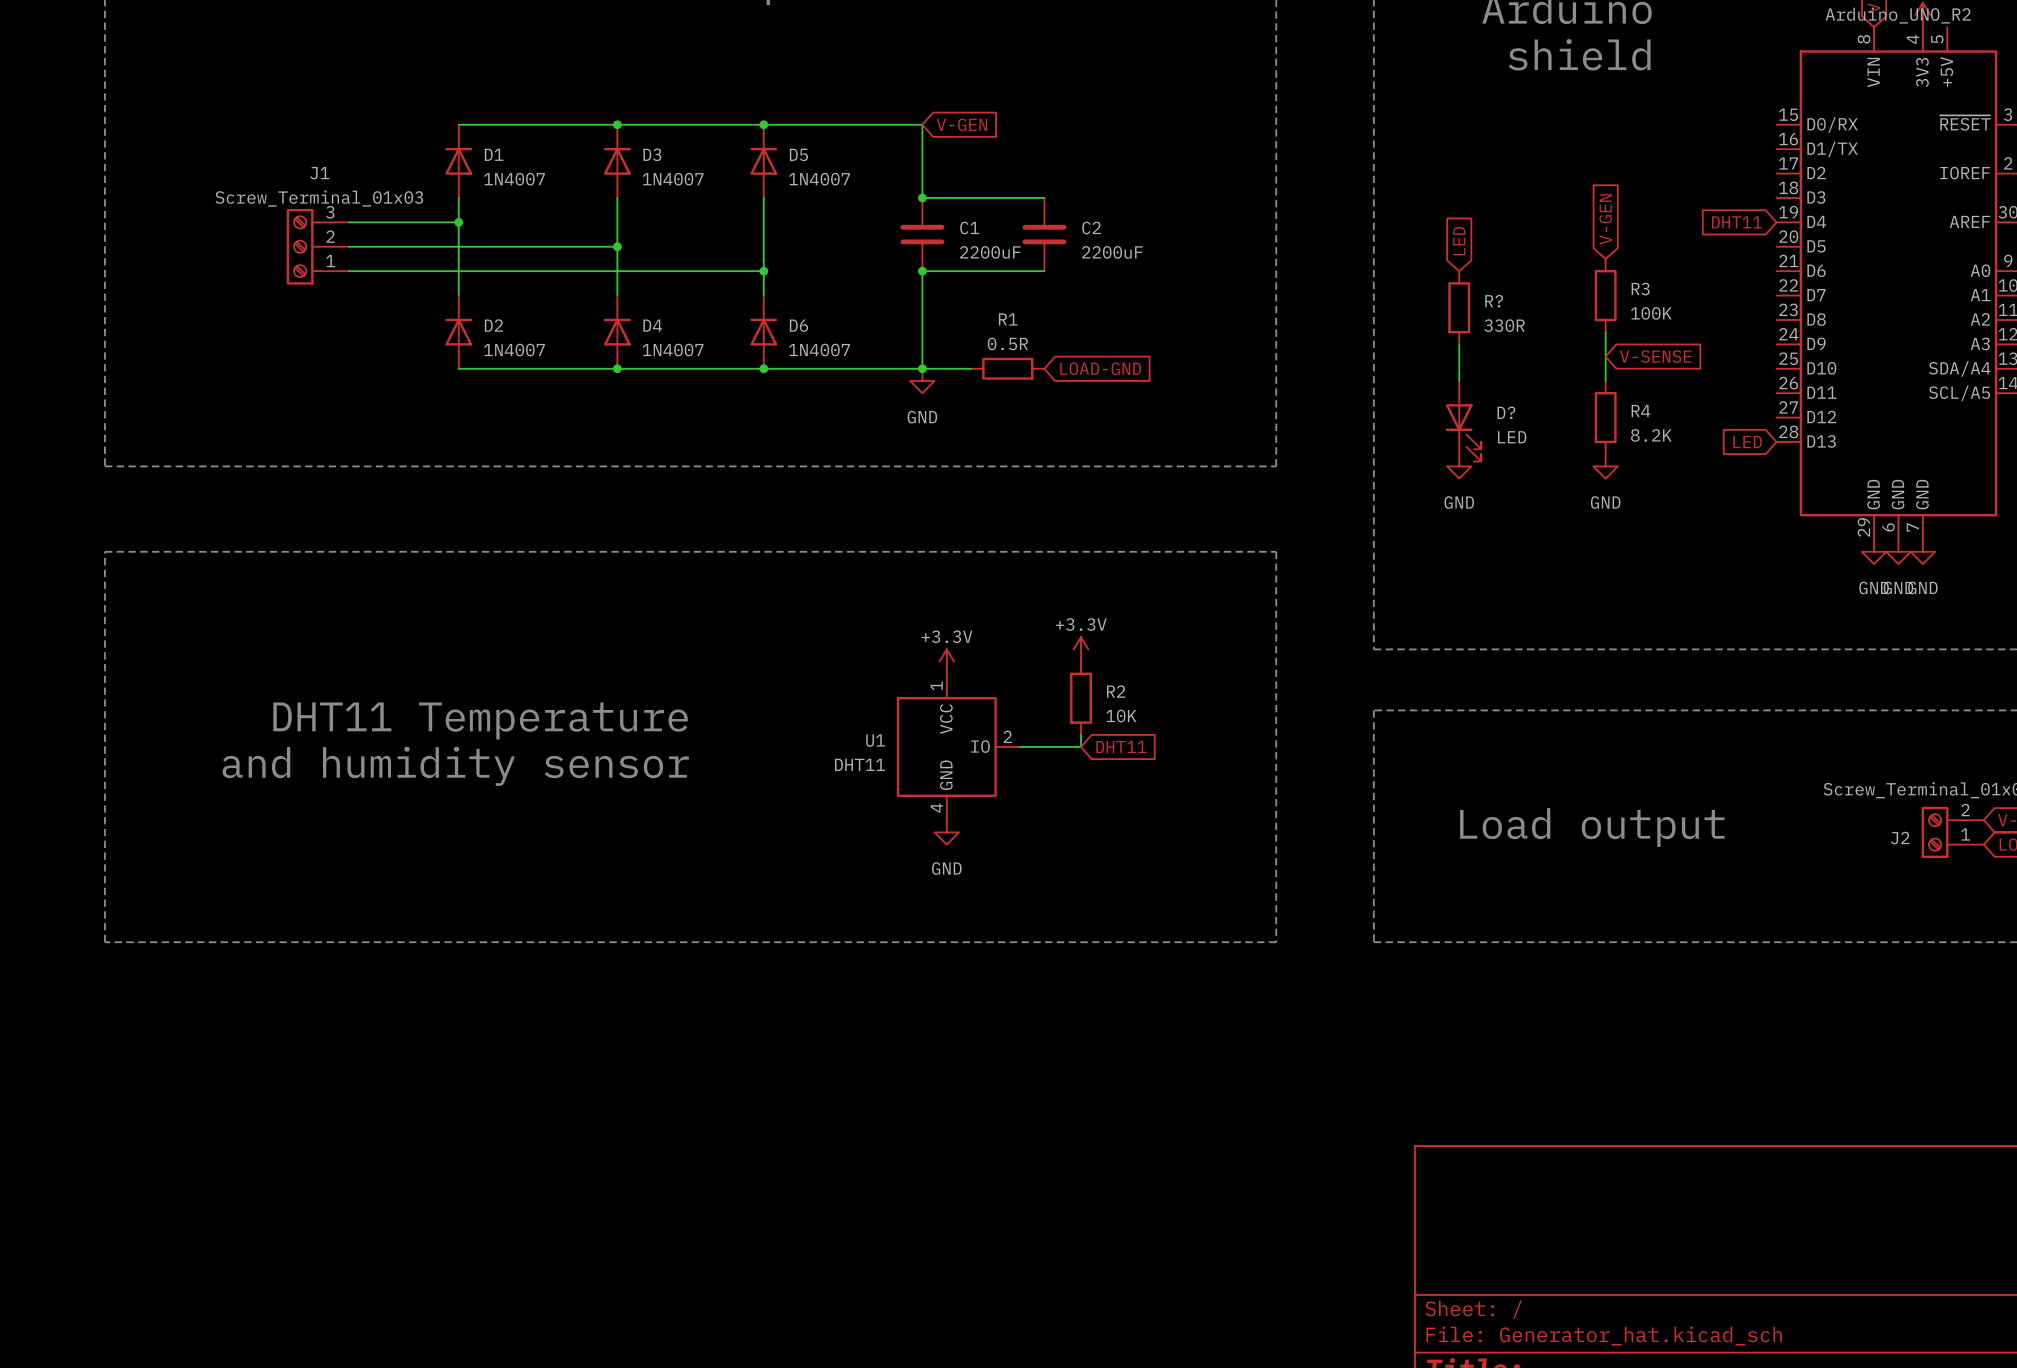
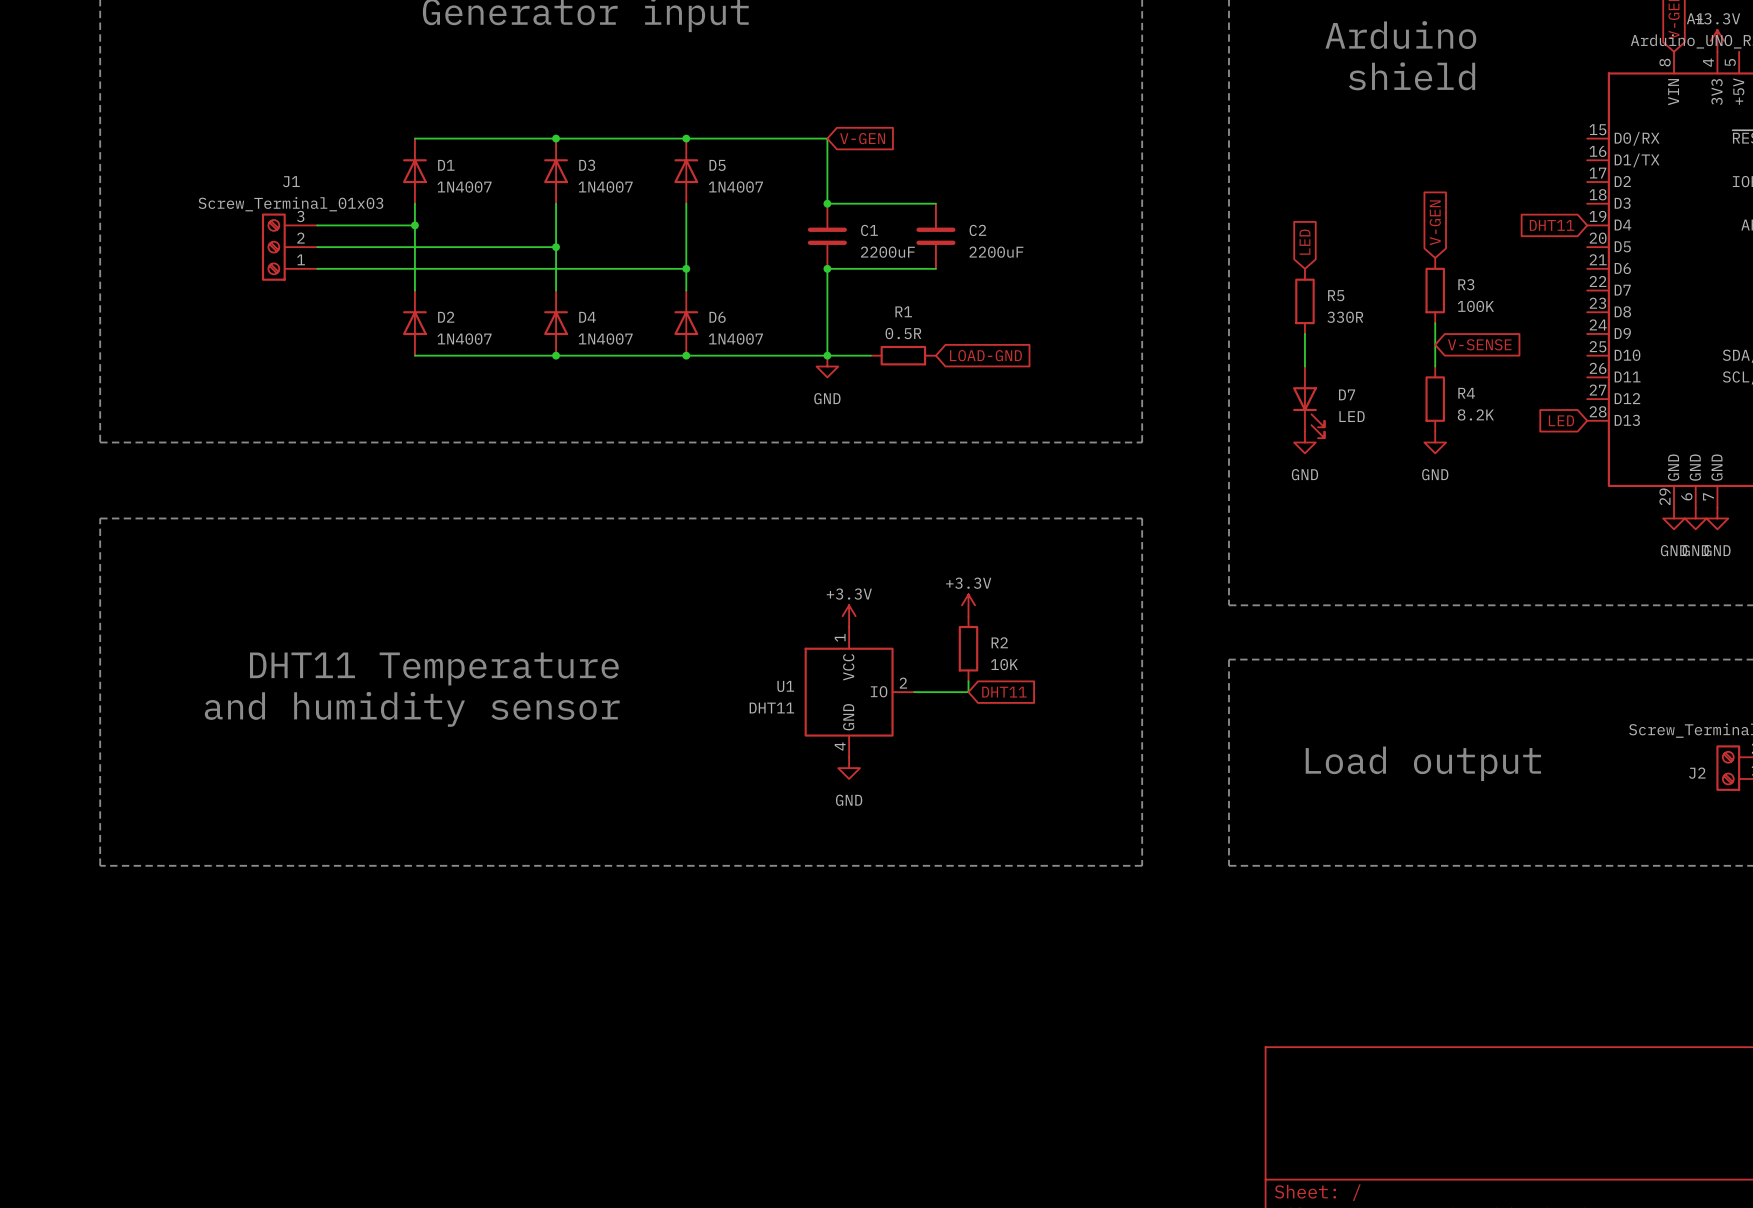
R? name: R? (1494, 301) -> R5 (1336, 295)
D? name: D? (1506, 412) -> D7 (1347, 394)

